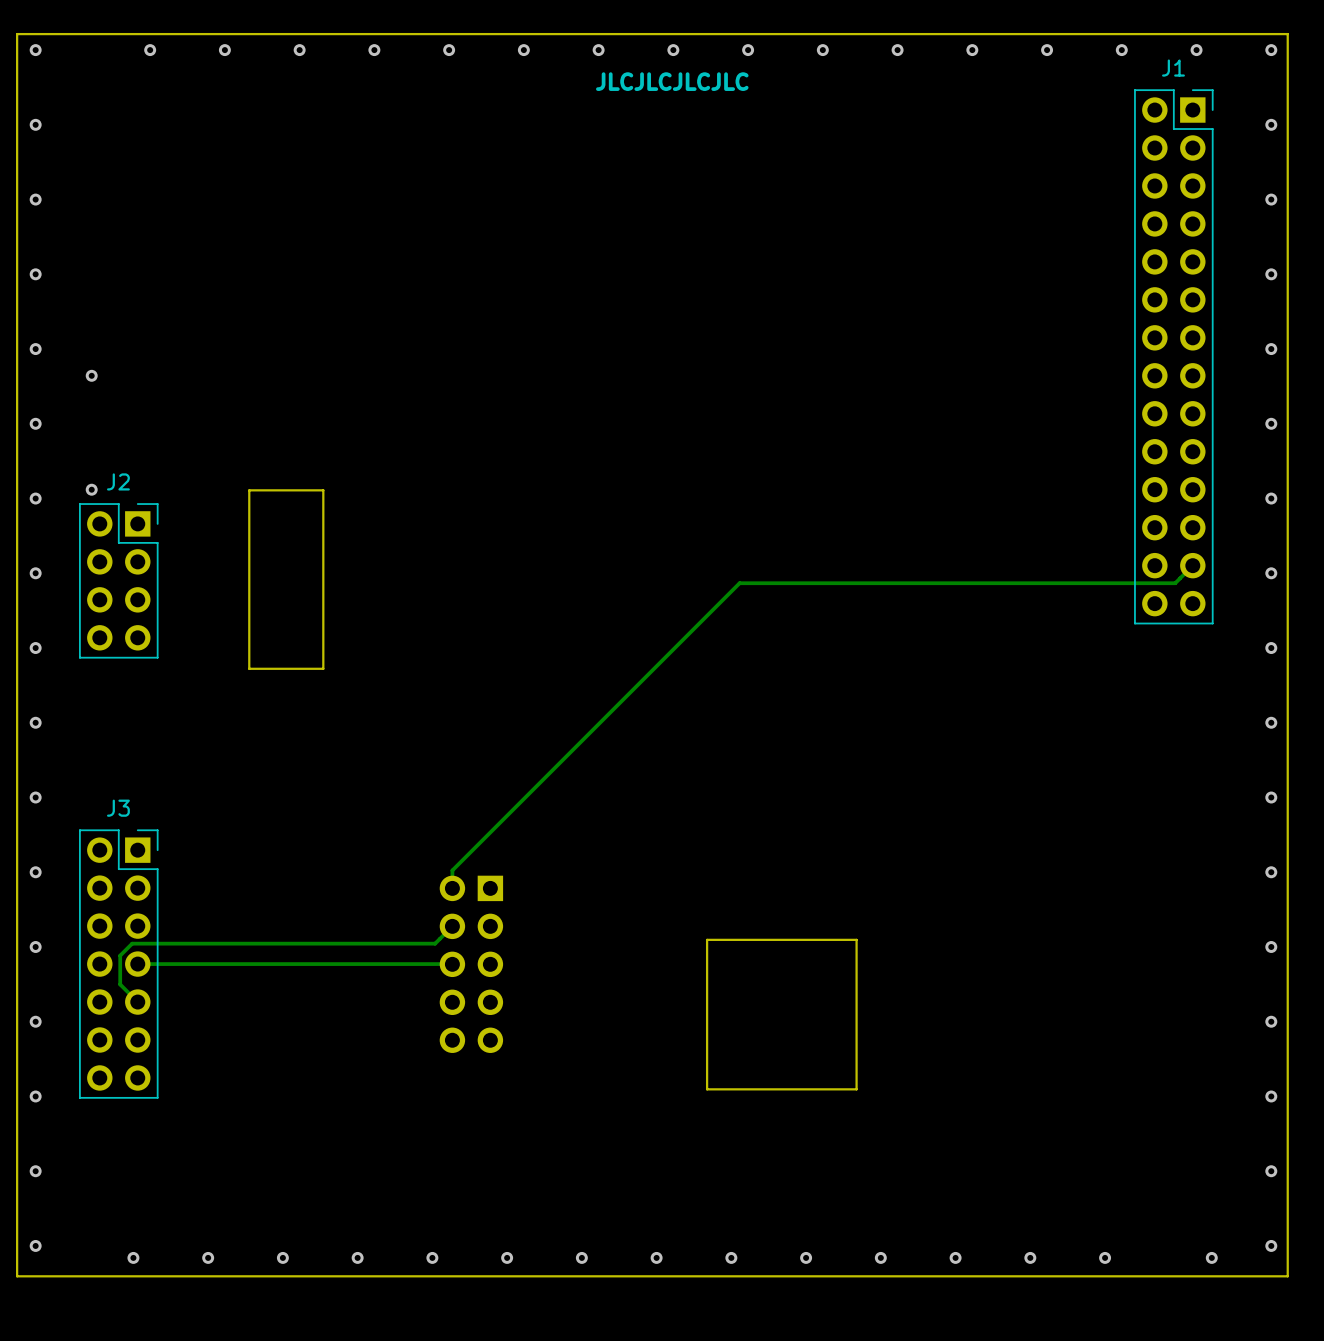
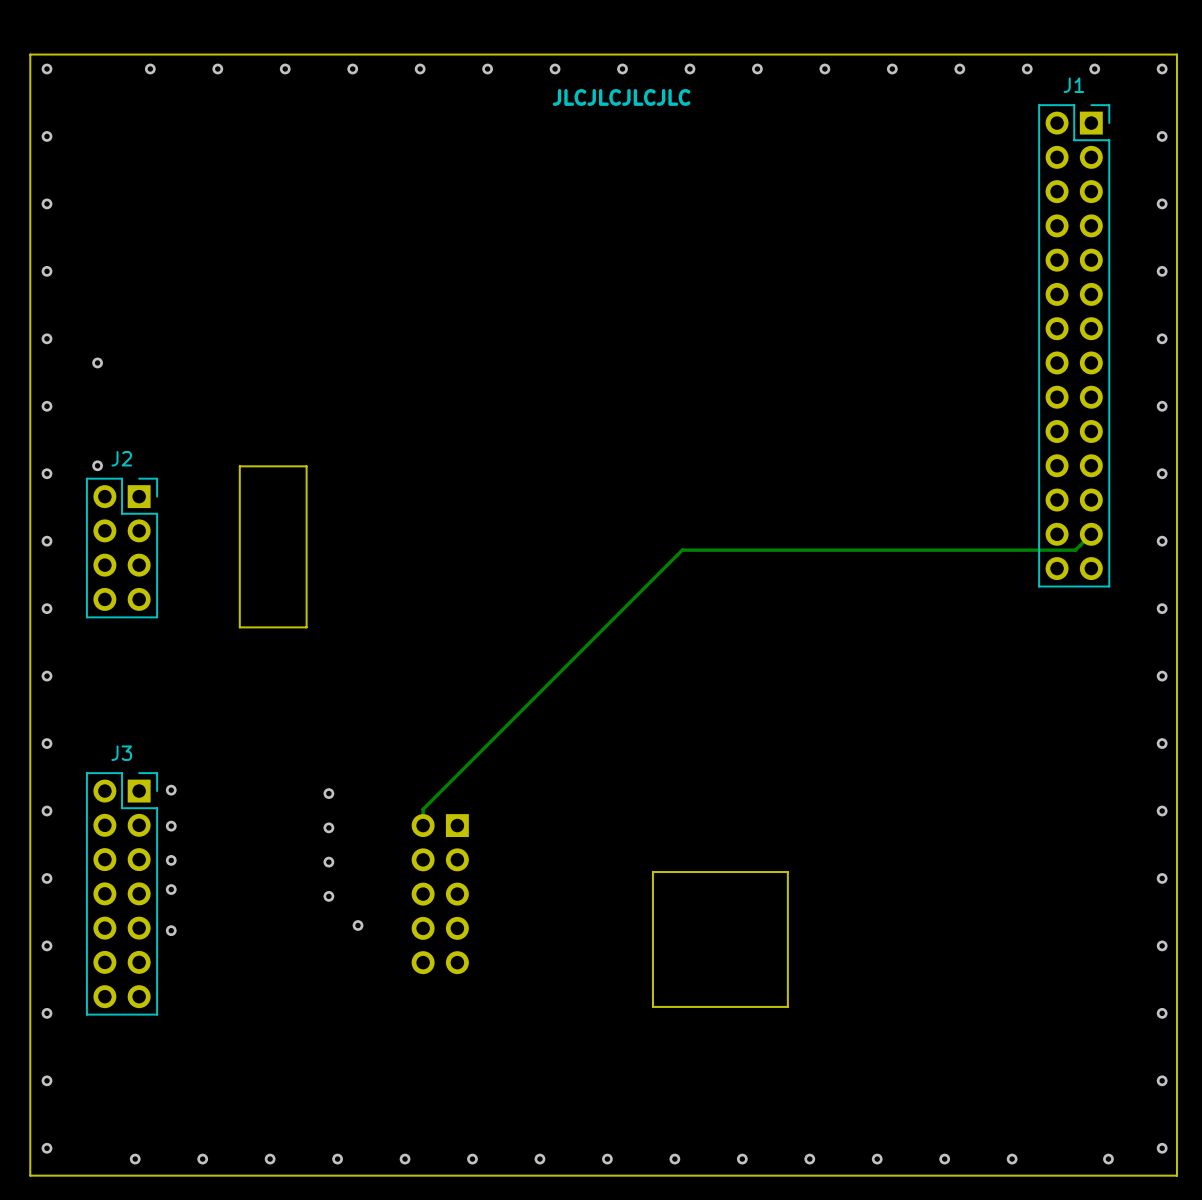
via: none -> (171, 790)
via: none -> (328, 793)
via: none -> (171, 826)
via: none -> (328, 827)
via: none -> (171, 860)
track: (452, 926) (435, 943) (132, 943) (120, 955) (120, 984) (137, 1002) -> none
via: none -> (328, 862)
via: none -> (171, 889)
track: (137, 964) (452, 964) -> none
via: none -> (328, 896)
via: none -> (358, 925)
via: none -> (171, 930)

